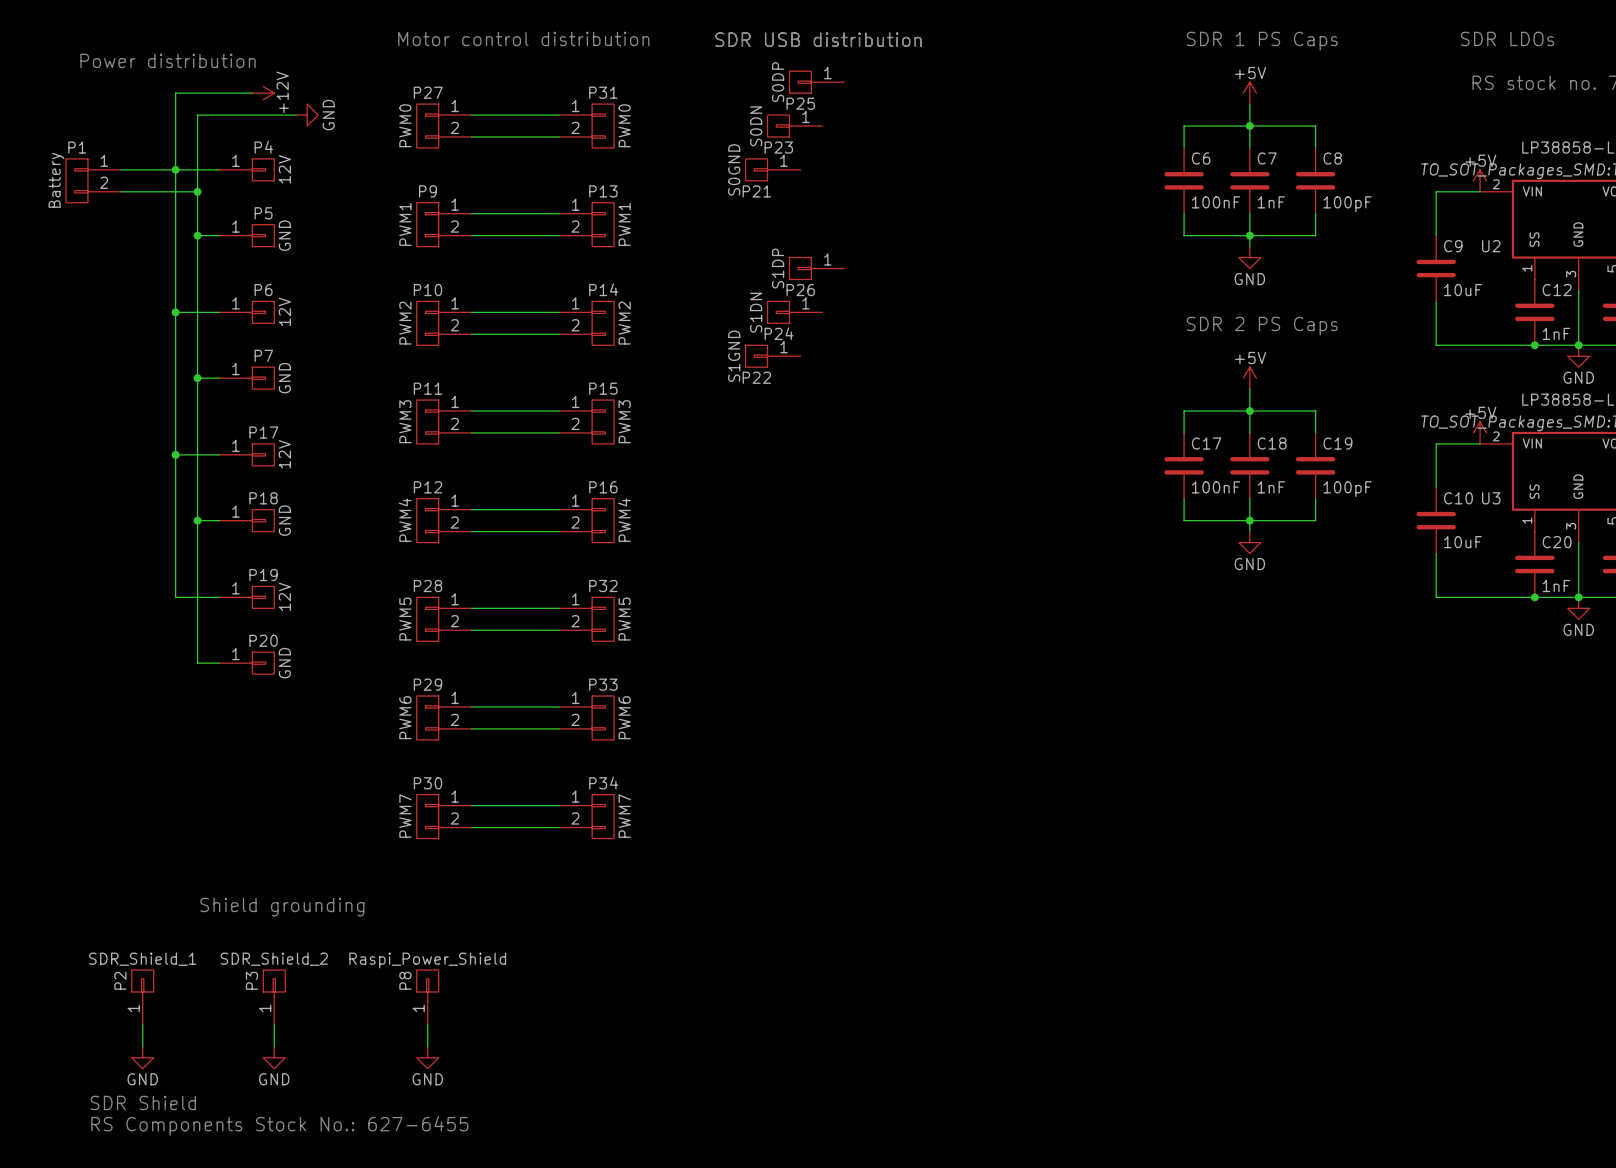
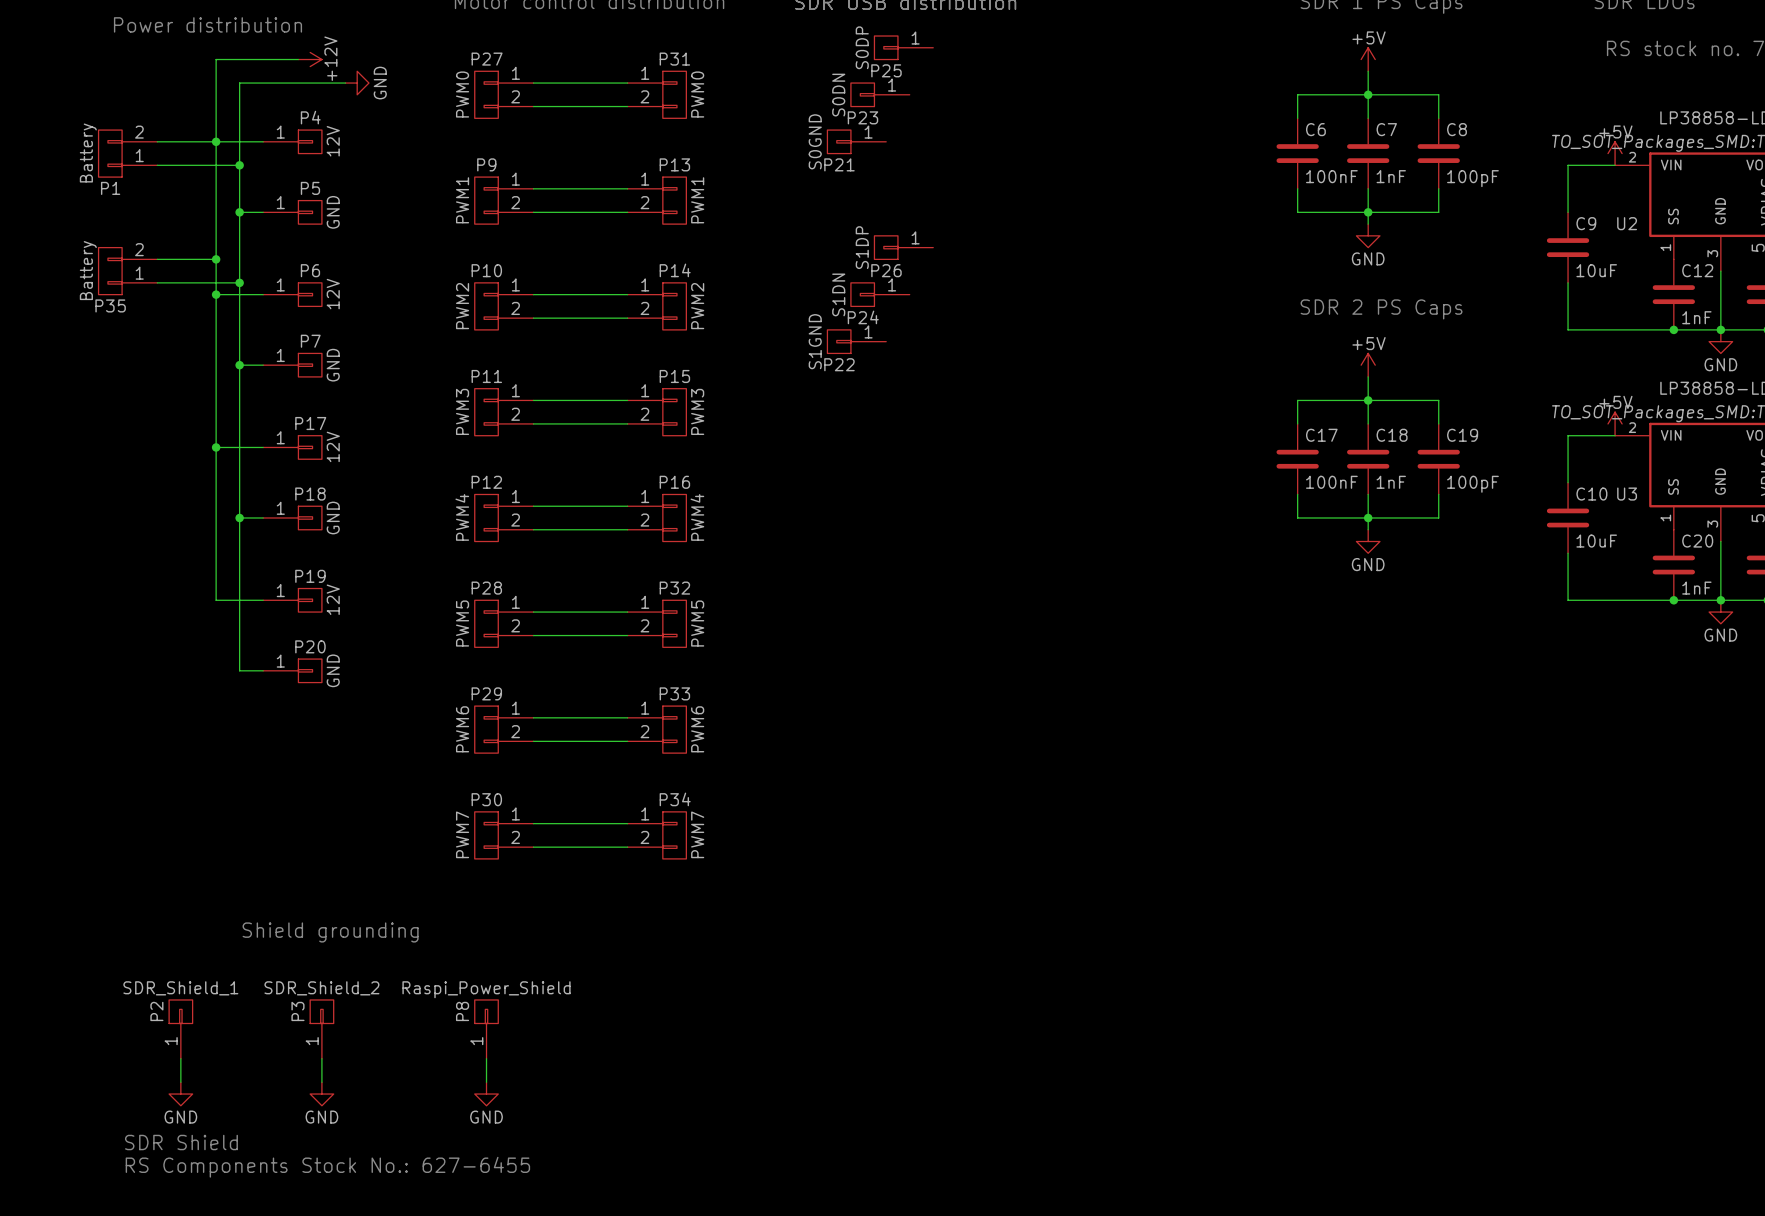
P1 flip: as is (76, 180) -> up-down (110, 153)
wire: none -> (157, 259) (216, 259)
junction: none -> (216, 259)
P35: none -> Battery (127, 271)
wire: none -> (157, 282) (239, 282)
junction: none -> (239, 282)

